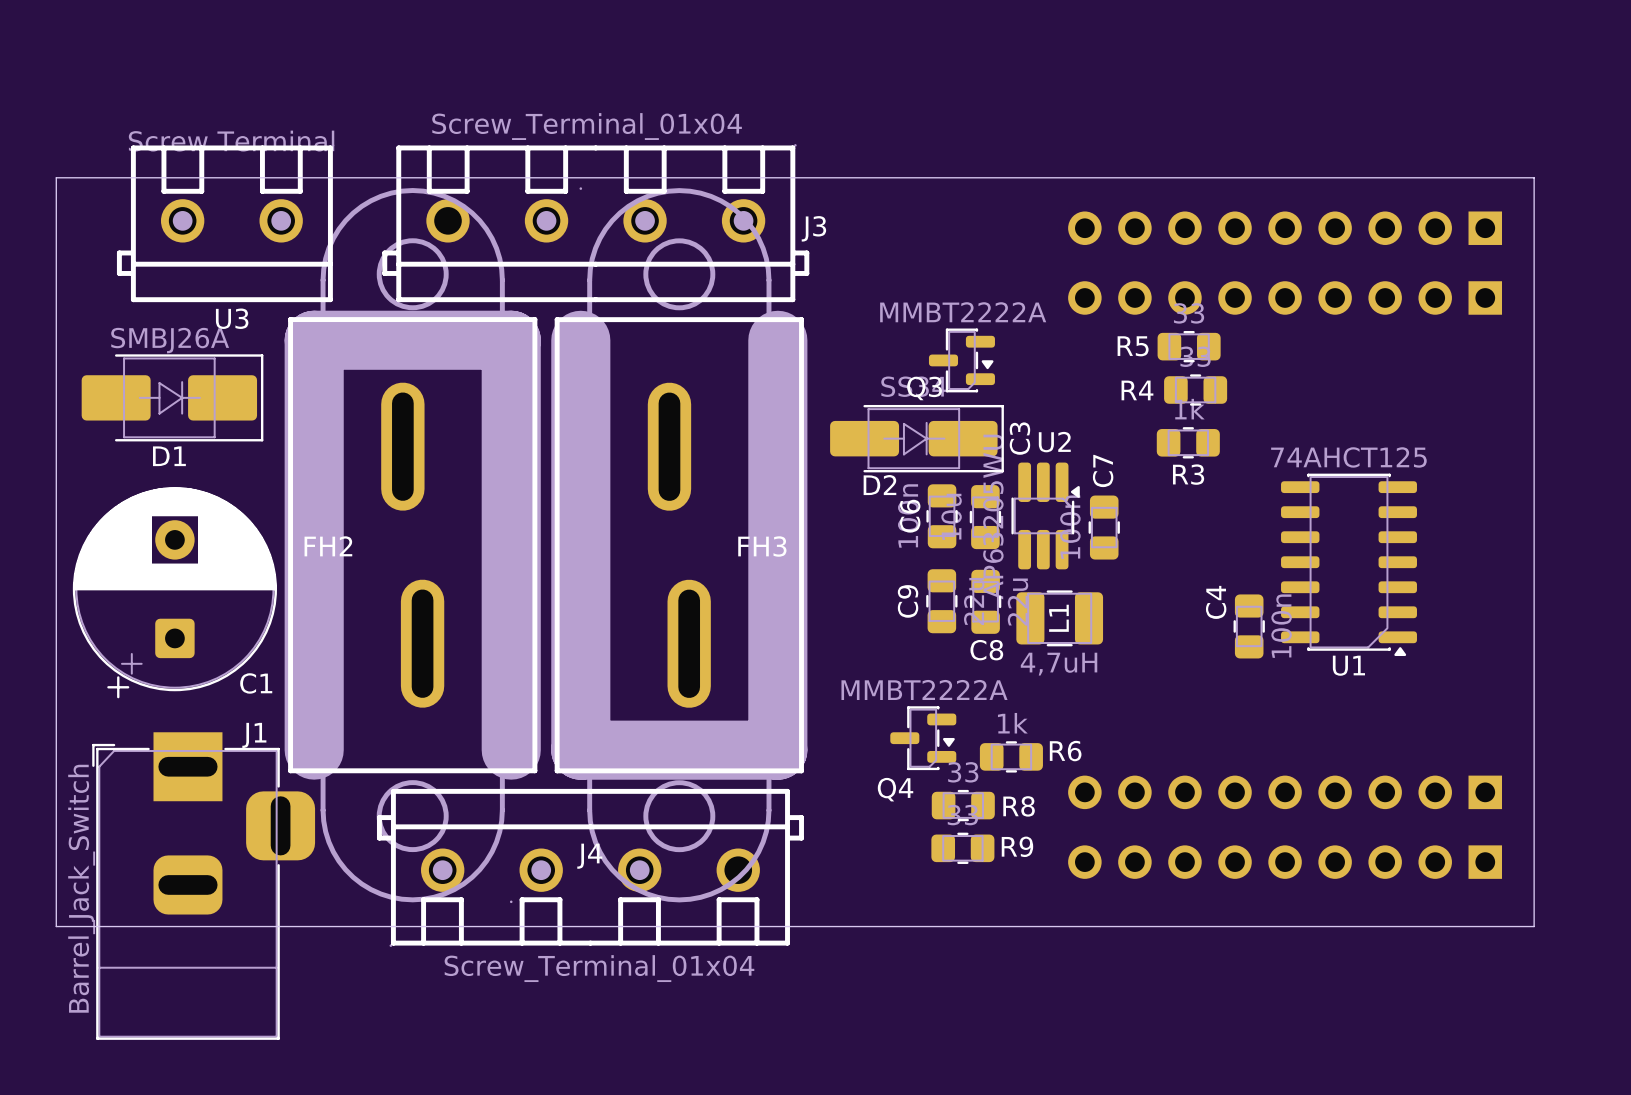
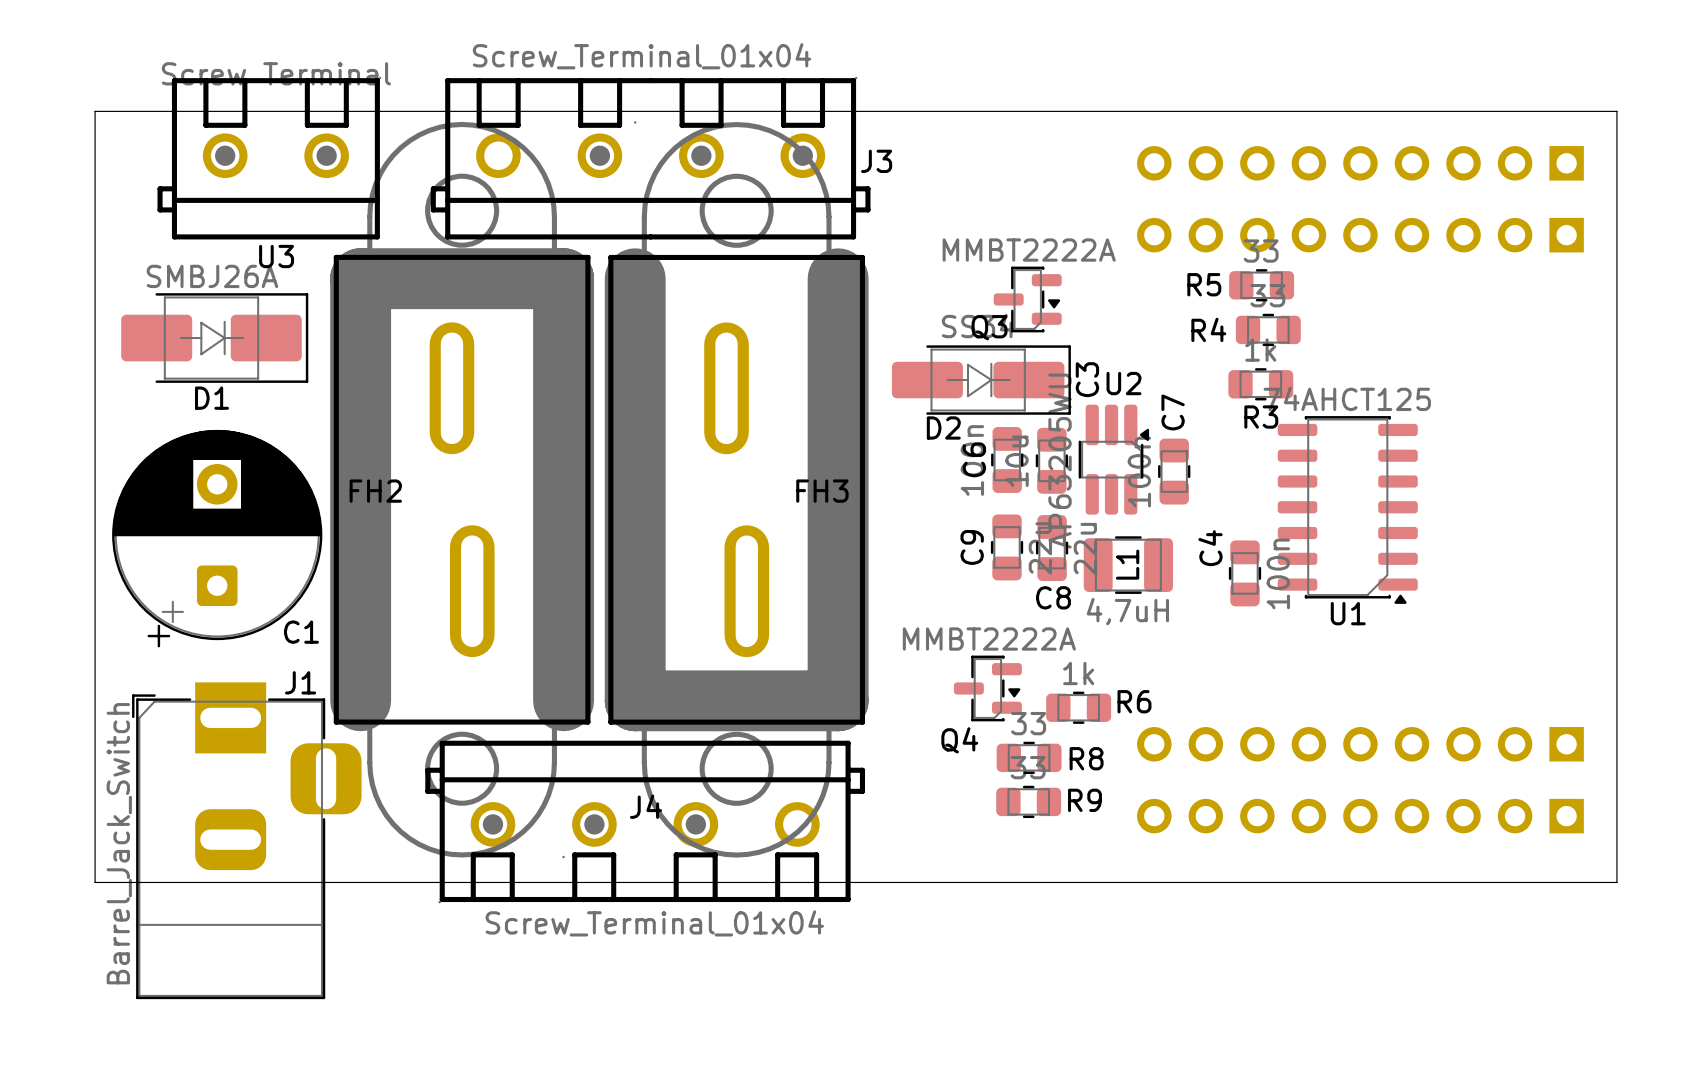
U1 position: (1349, 564) -> (1347, 509)
C4 position: (1249, 626) -> (1244, 573)

